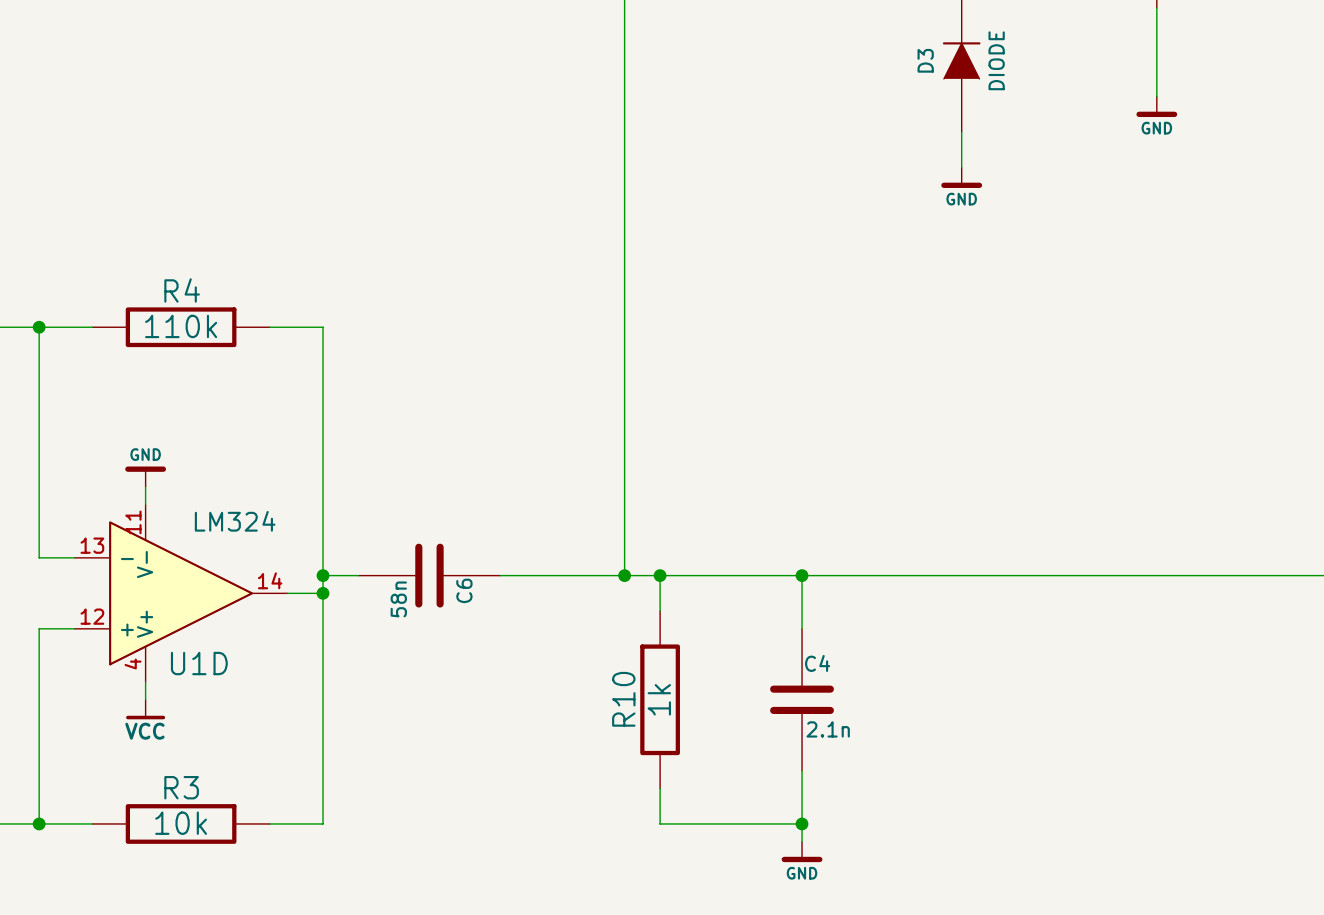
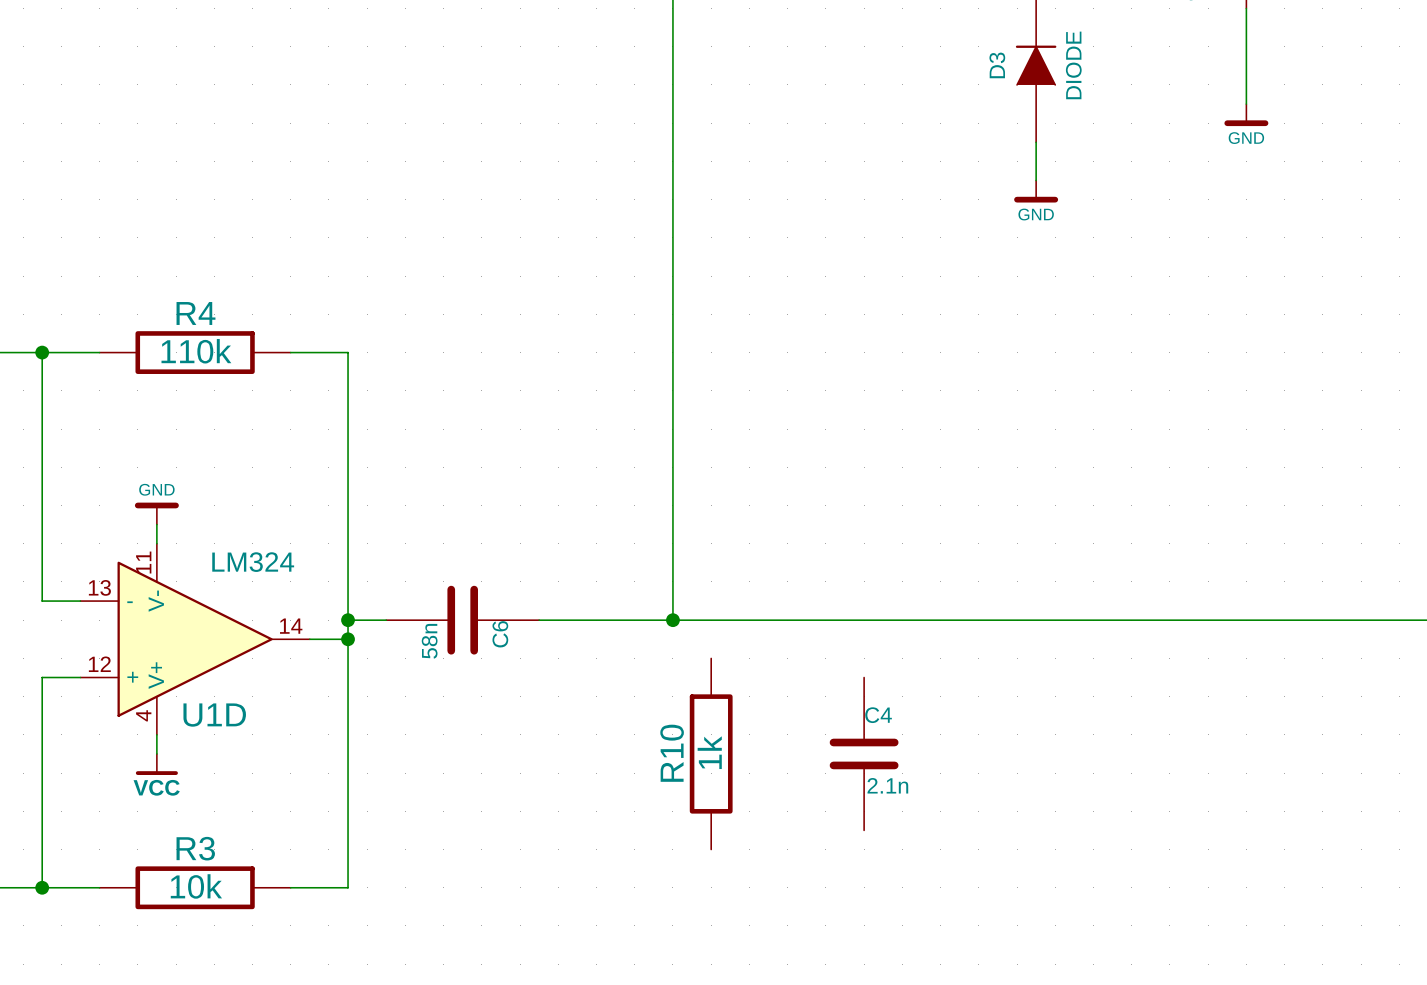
wire: (660, 575) (660, 611) -> none
junction: (660, 575) -> none
wire: (802, 575) (802, 628) -> none
junction: (802, 575) -> none
wire: (802, 770) (802, 841) -> none
wire: (660, 788) (660, 823) (802, 823) -> none
junction: (802, 823) -> none
power symbol: GND (802, 851) -> none

